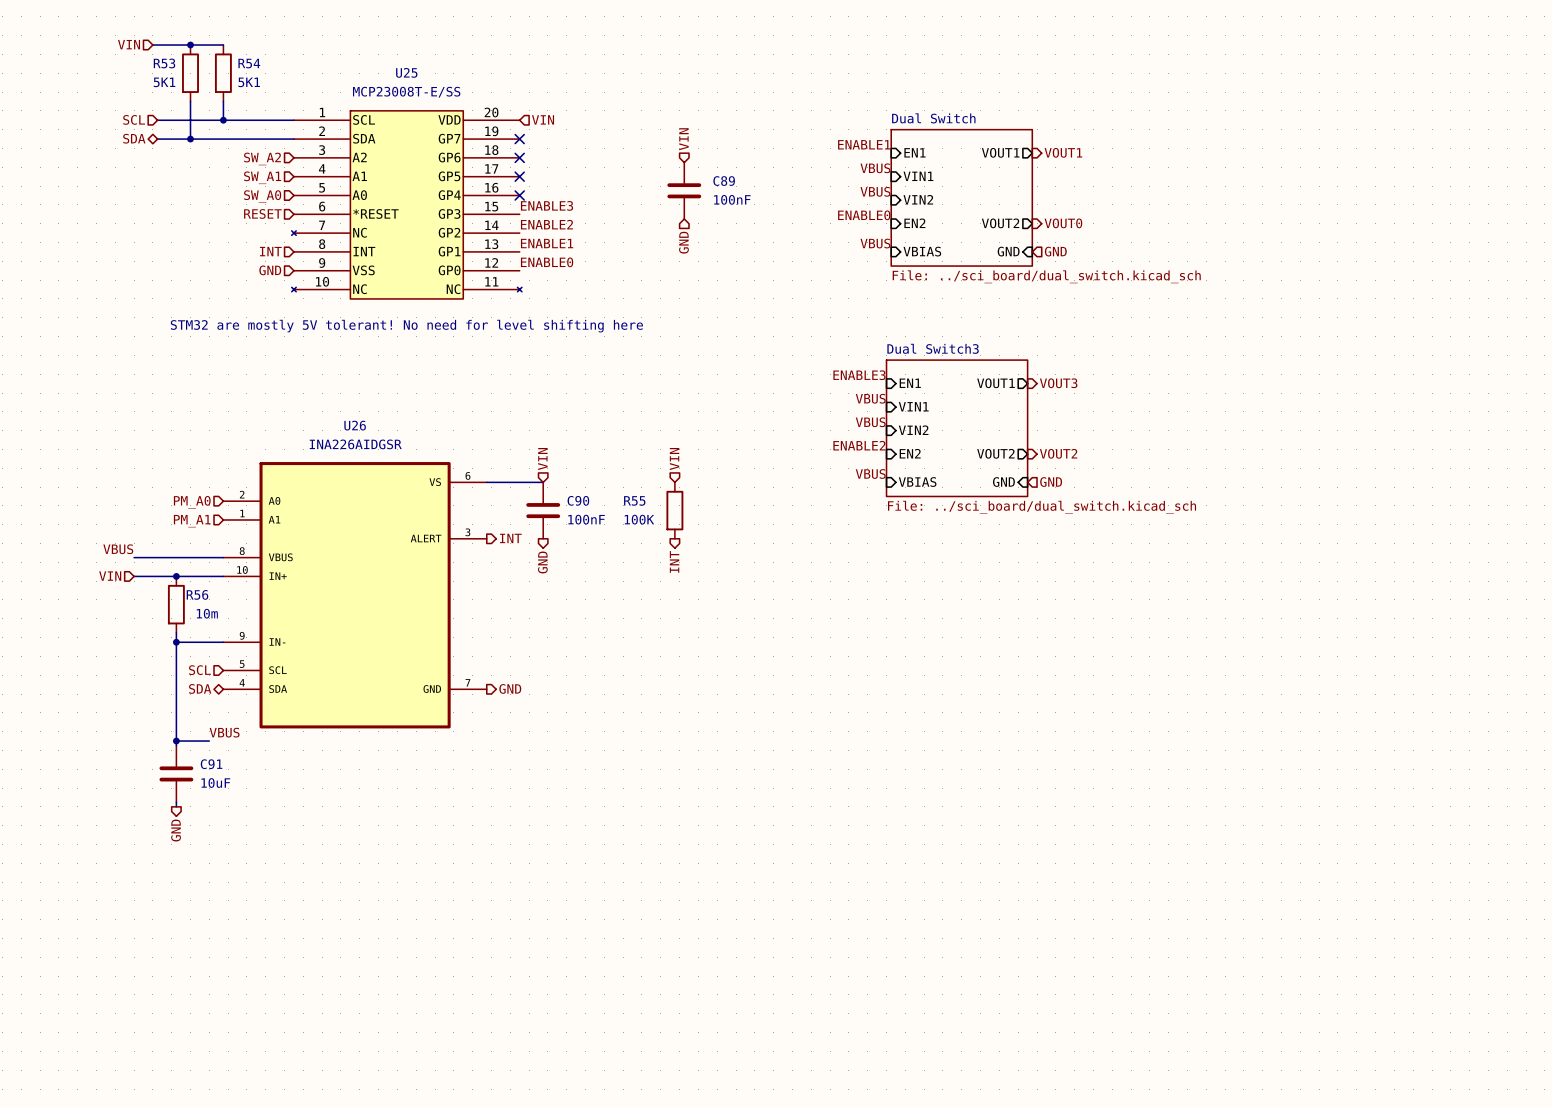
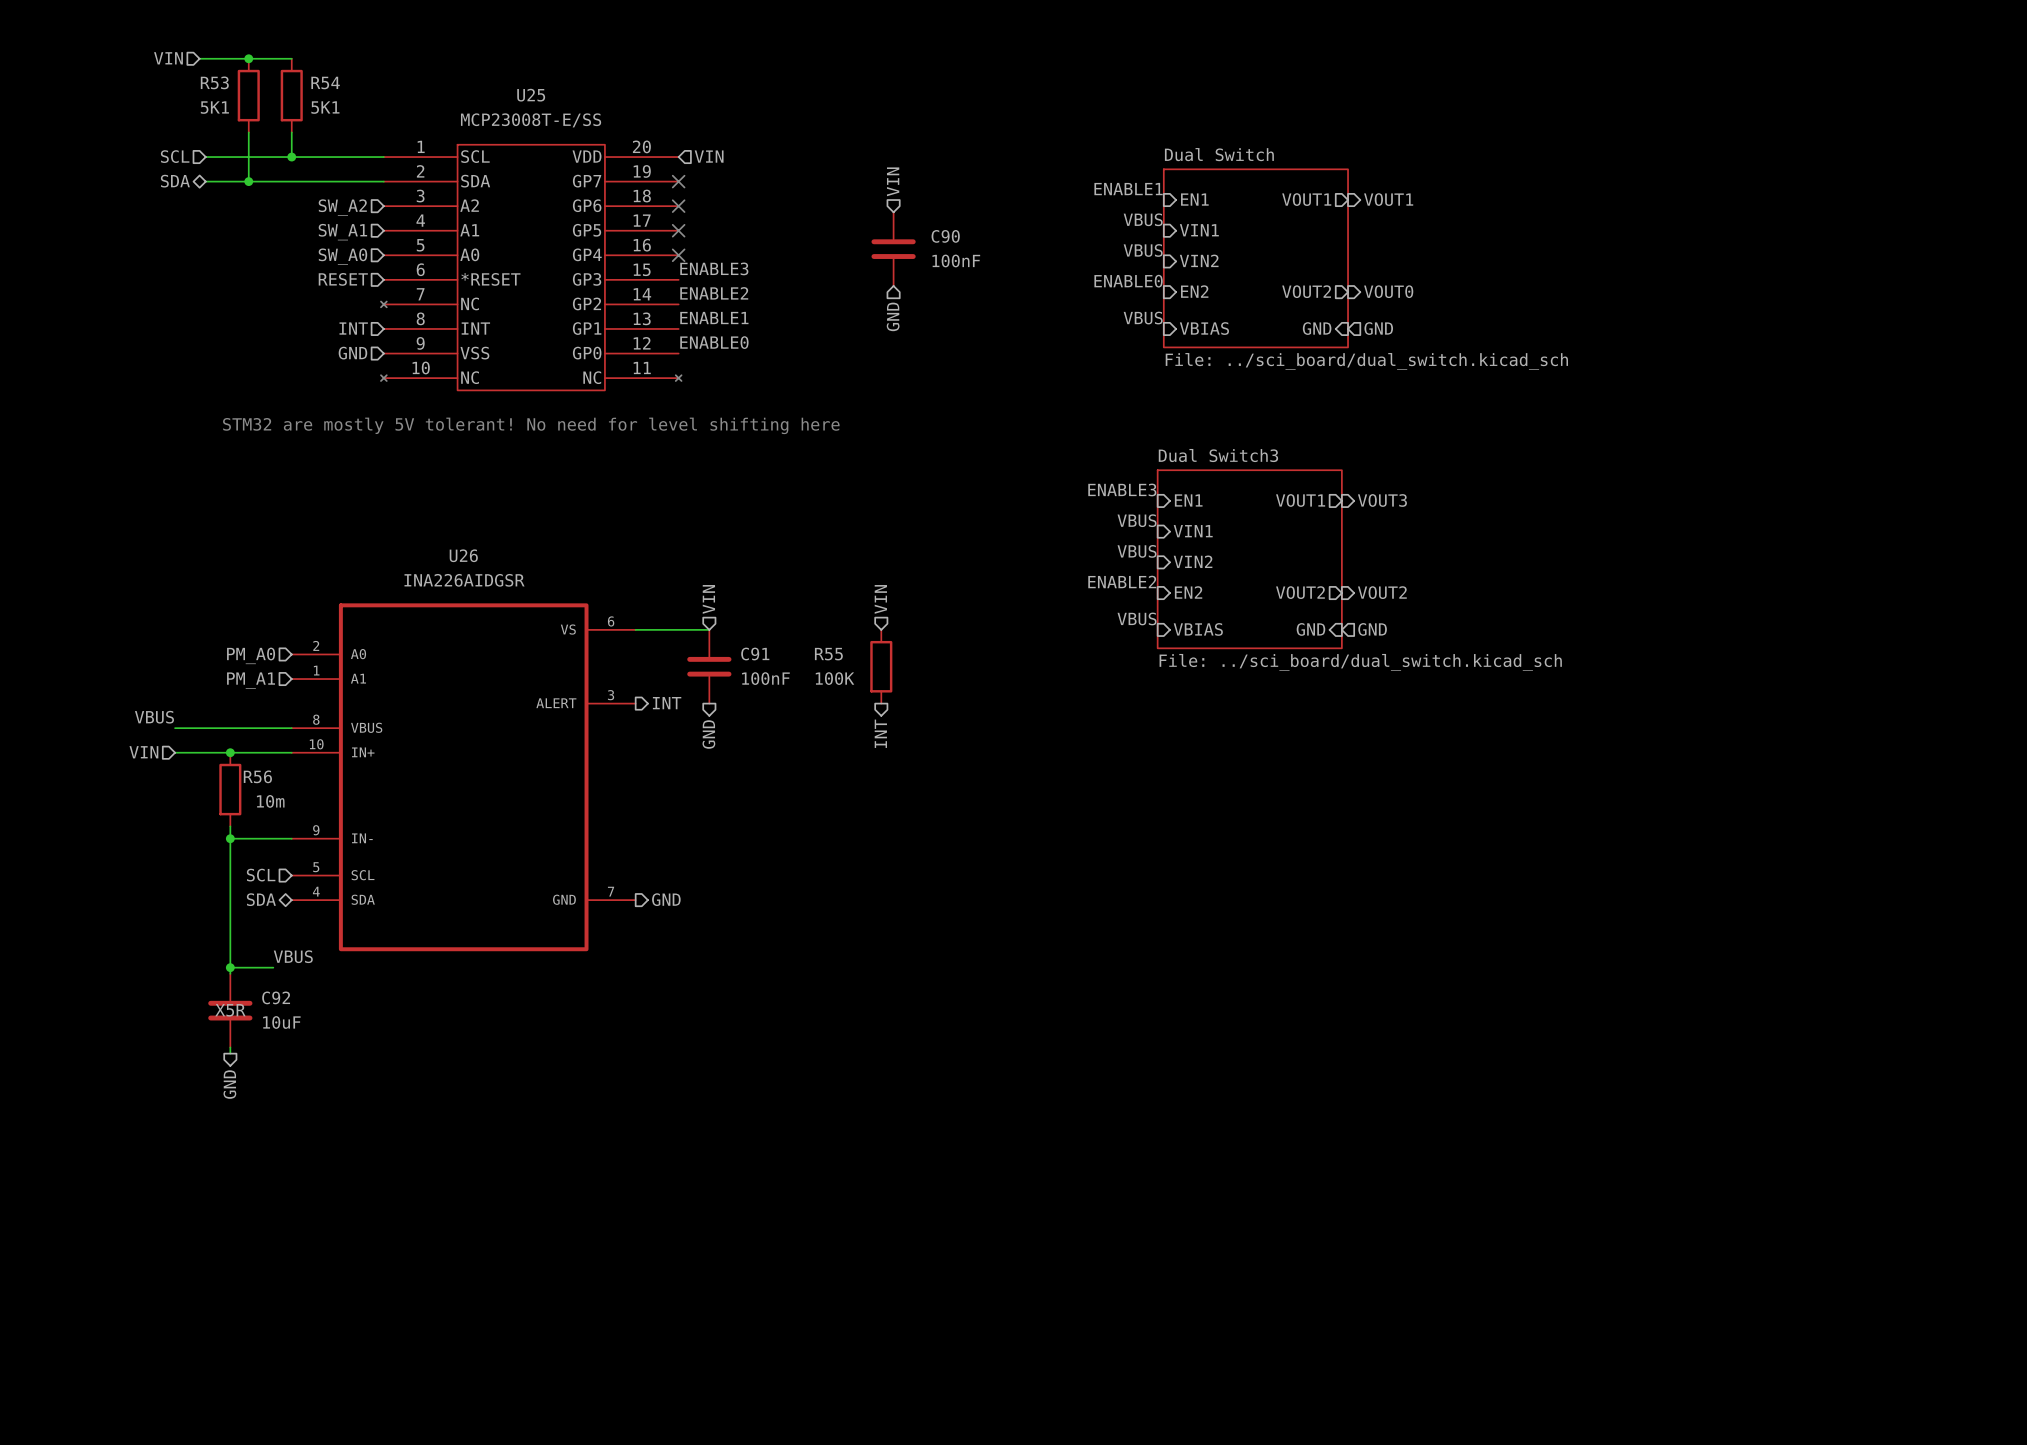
C89 name: C89 (724, 181) -> C90 (945, 236)
C90 name: C90 (578, 500) -> C91 (755, 654)
C91 name: C91 (211, 764) -> C92 (276, 997)
C91 text: none -> X5R (230, 1010)

